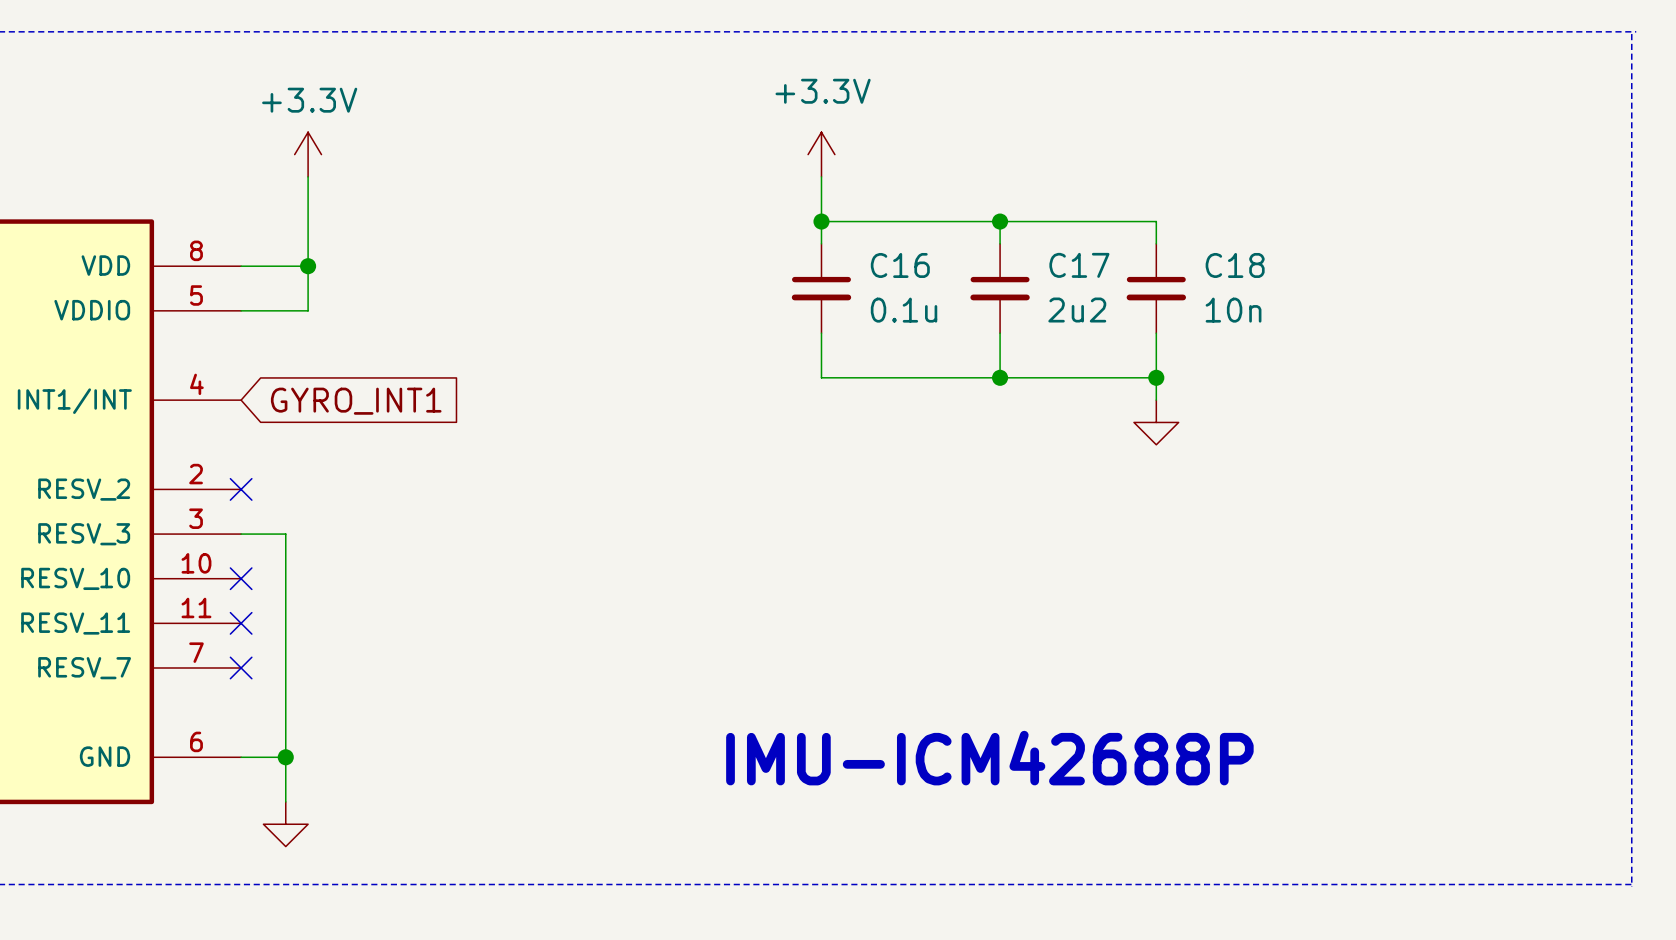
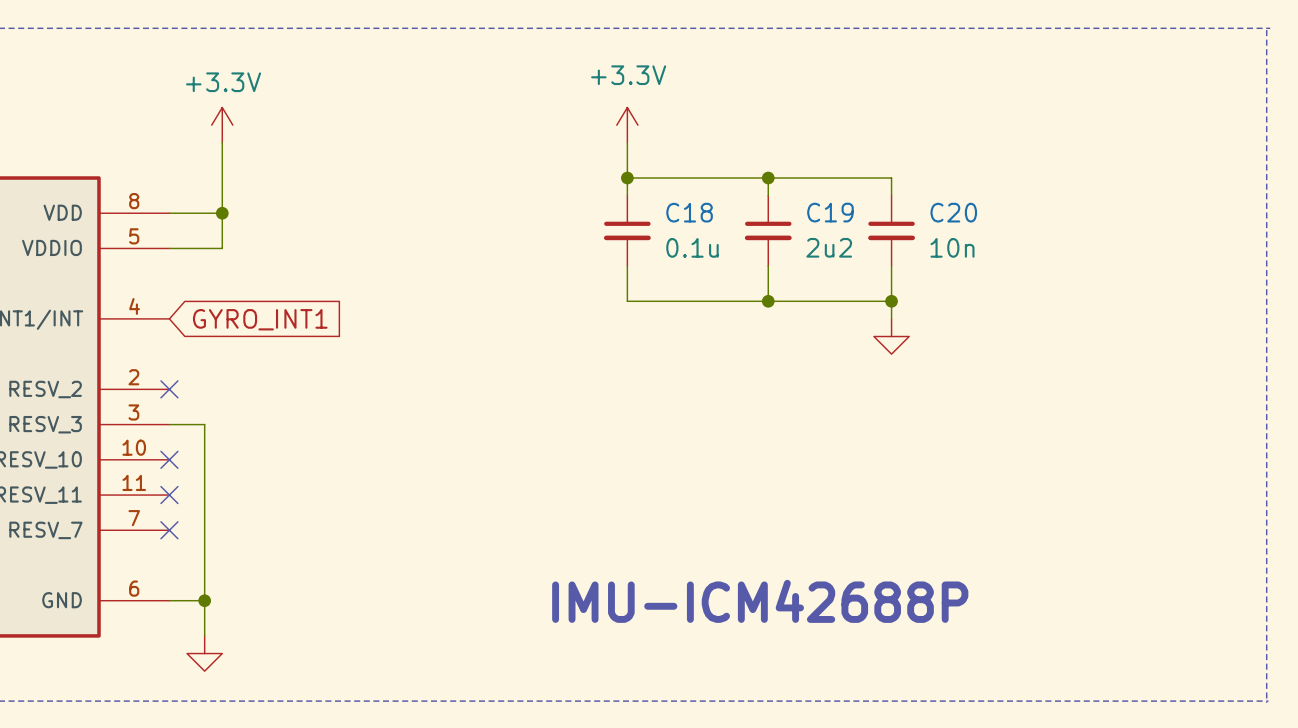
C16 name: C16 (900, 265) -> C18 (689, 212)
C17 name: C17 (1079, 265) -> C19 (830, 212)
C18 name: C18 (1235, 265) -> C20 (953, 212)

